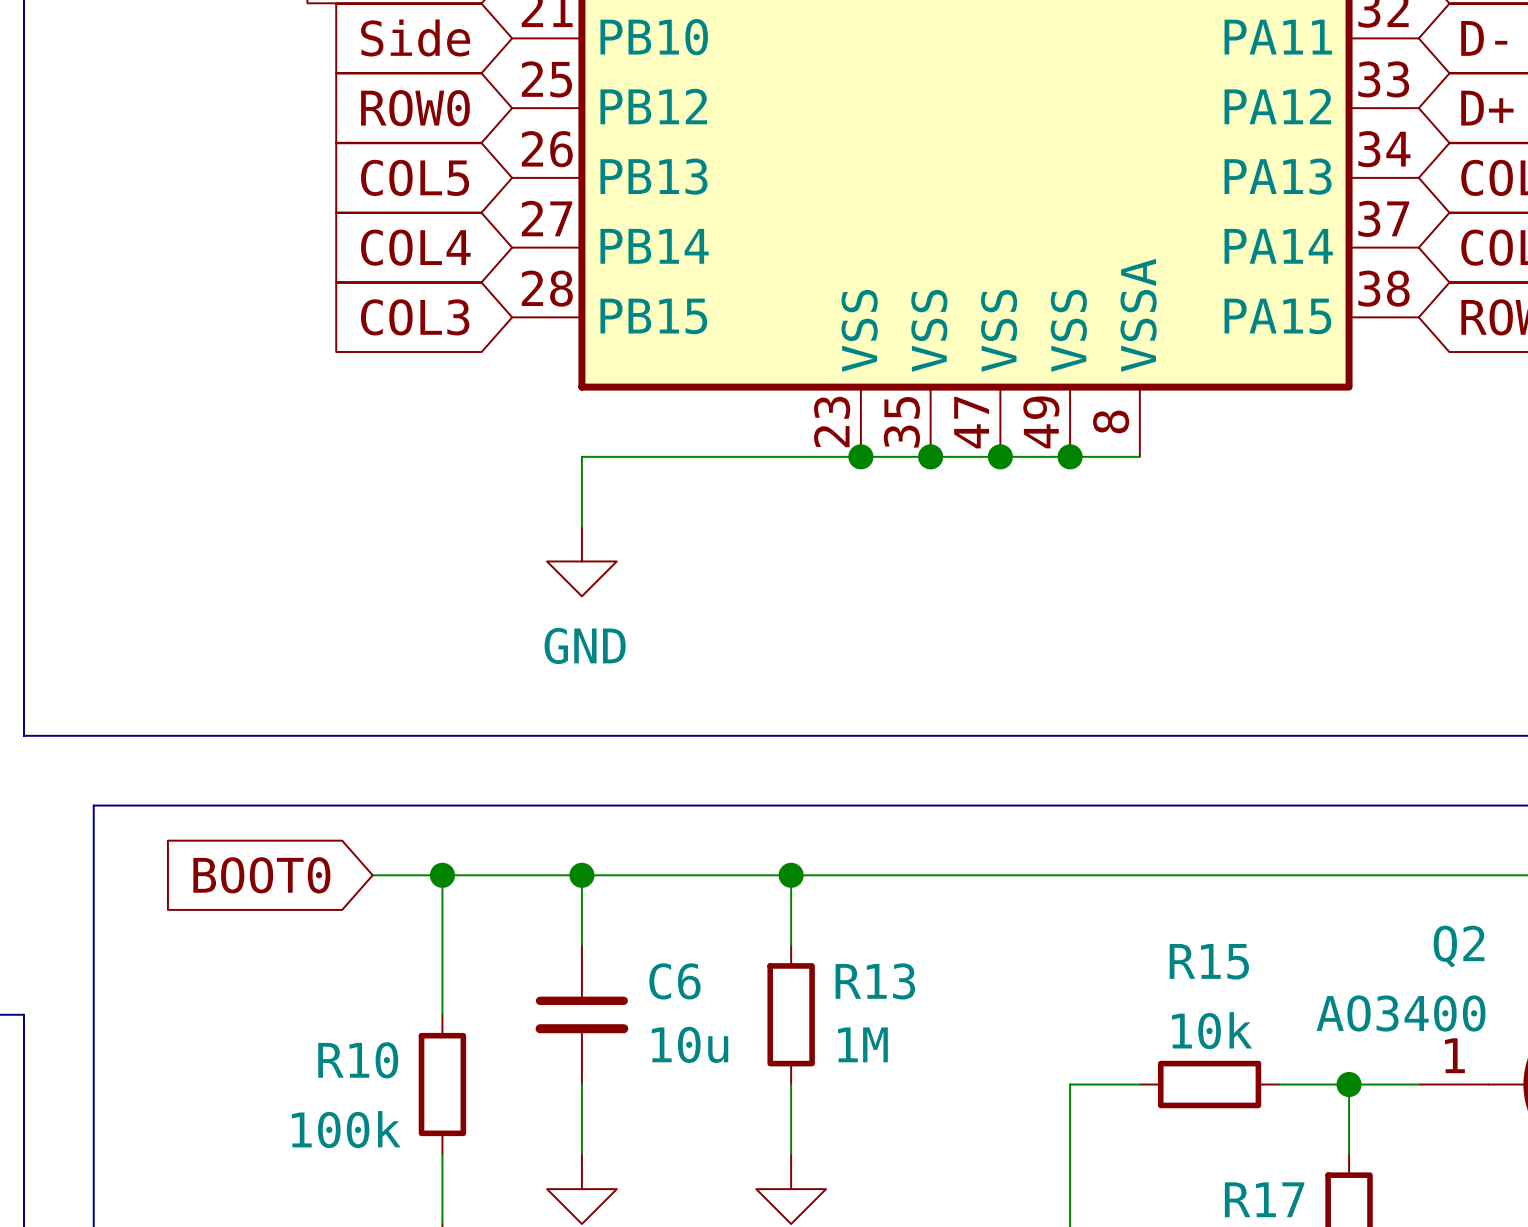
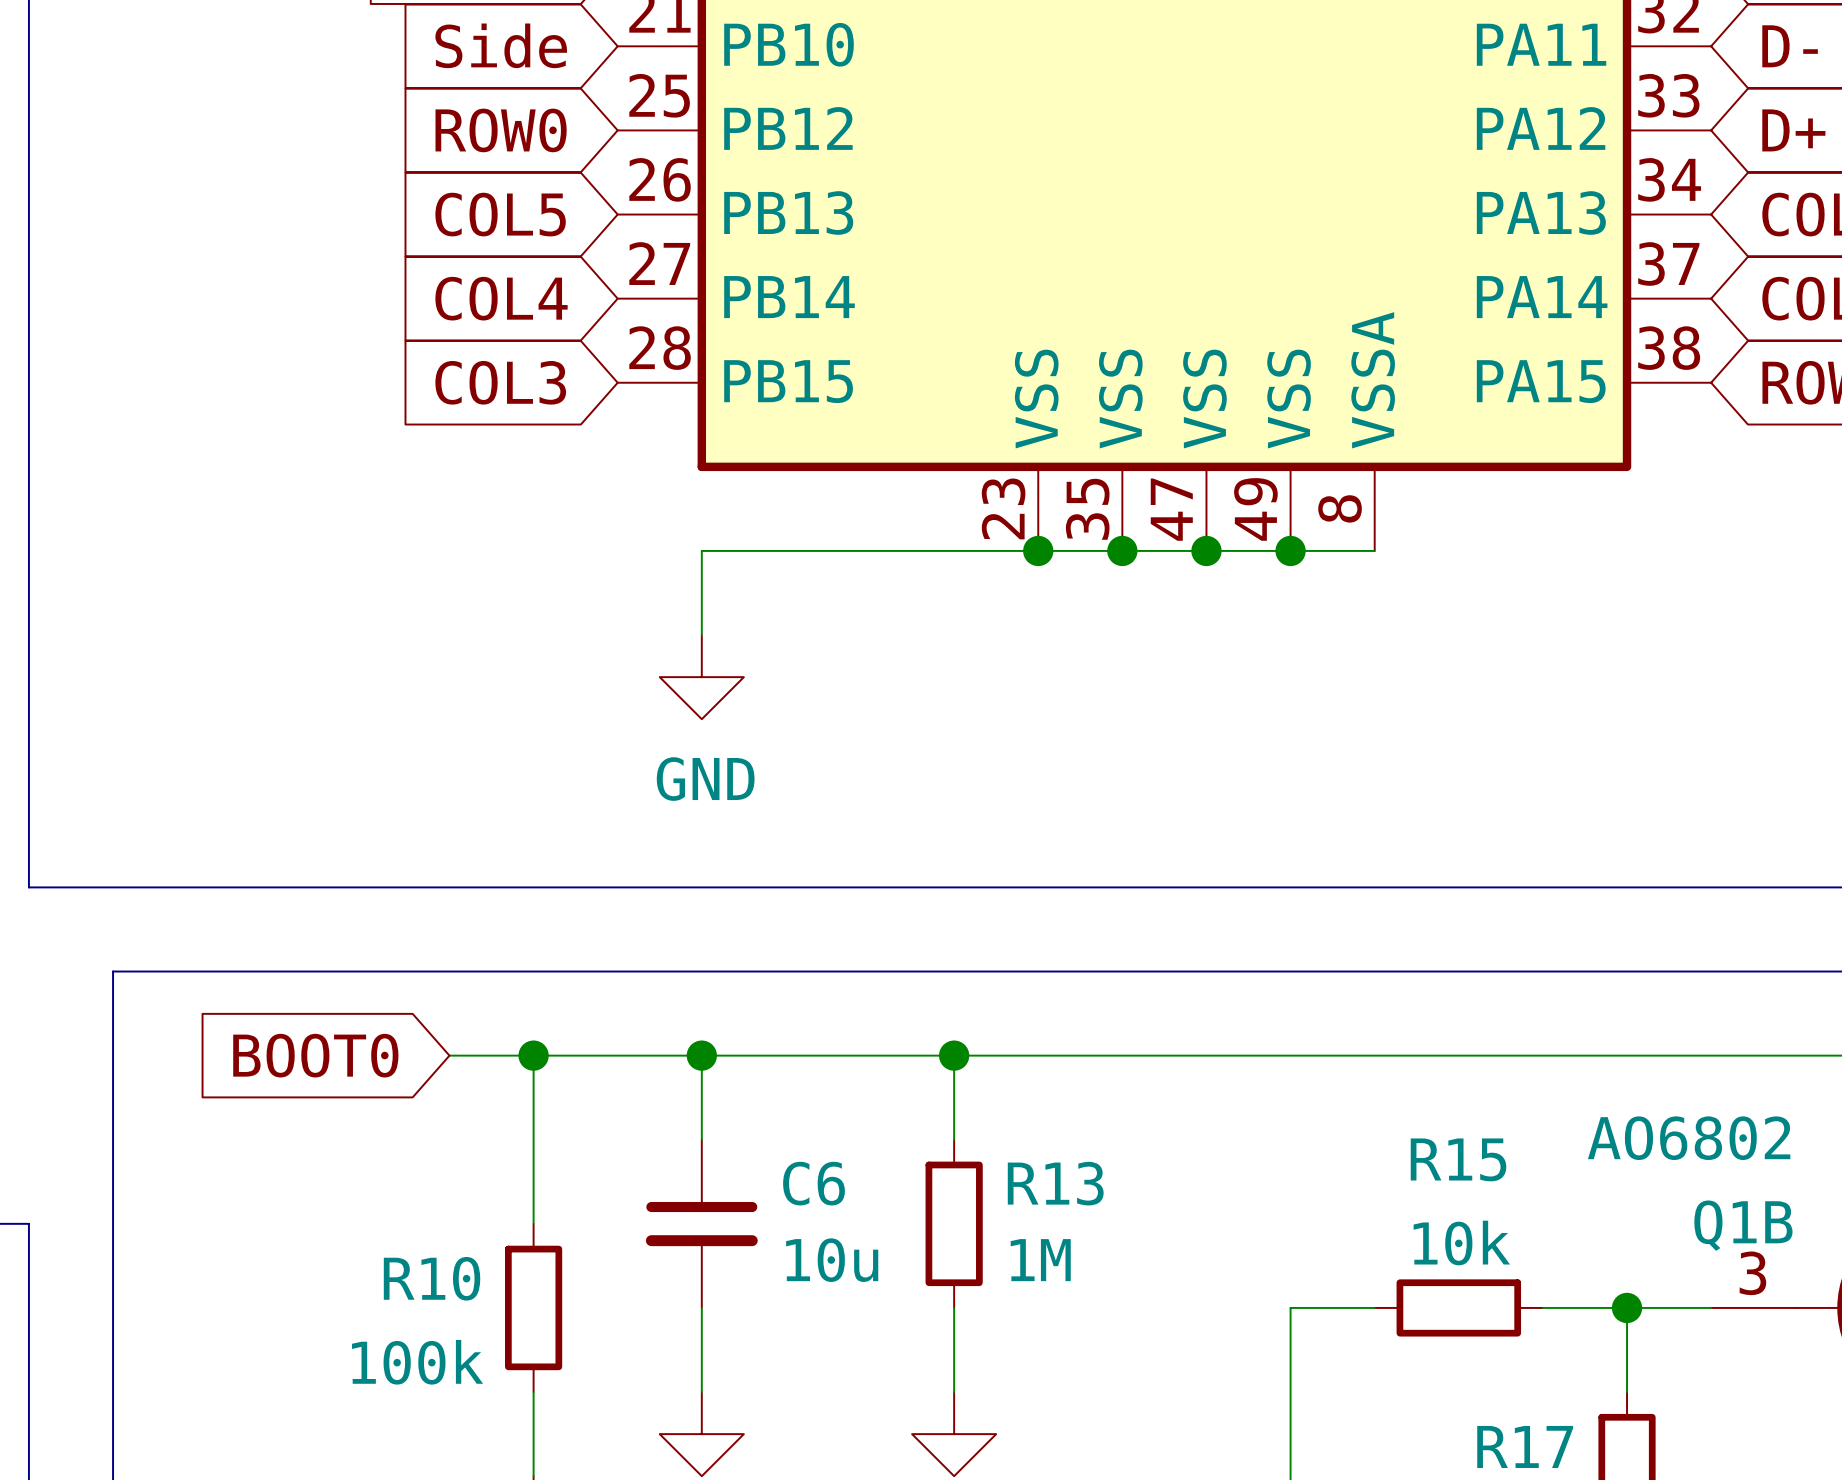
Q2 name: Q2 (1459, 946) -> Q1B (1743, 1225)
Q2 value: AO3400 (1401, 1013) -> AO6802 (1689, 1138)
Q2 pin number: 1 (1454, 1055) -> 3 (1752, 1273)

